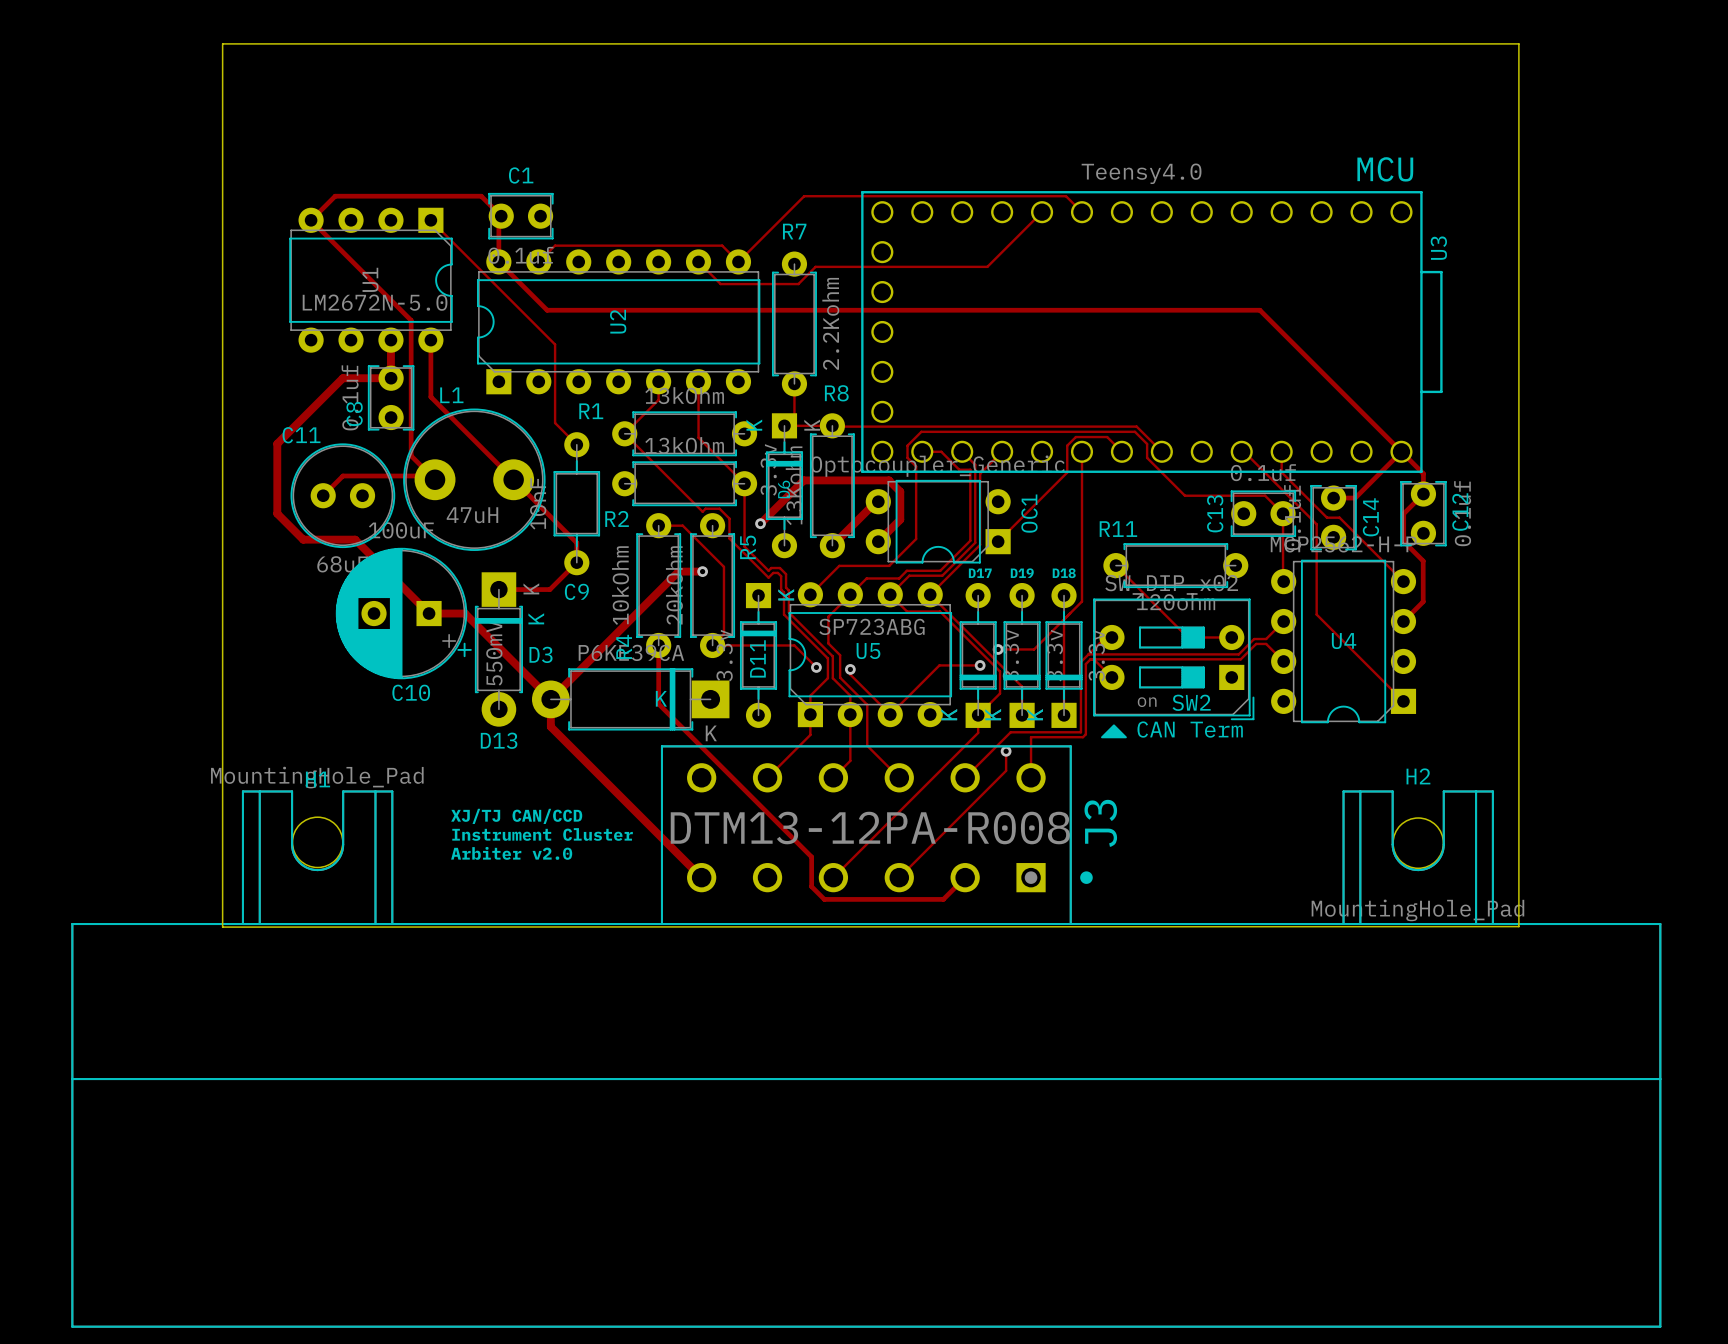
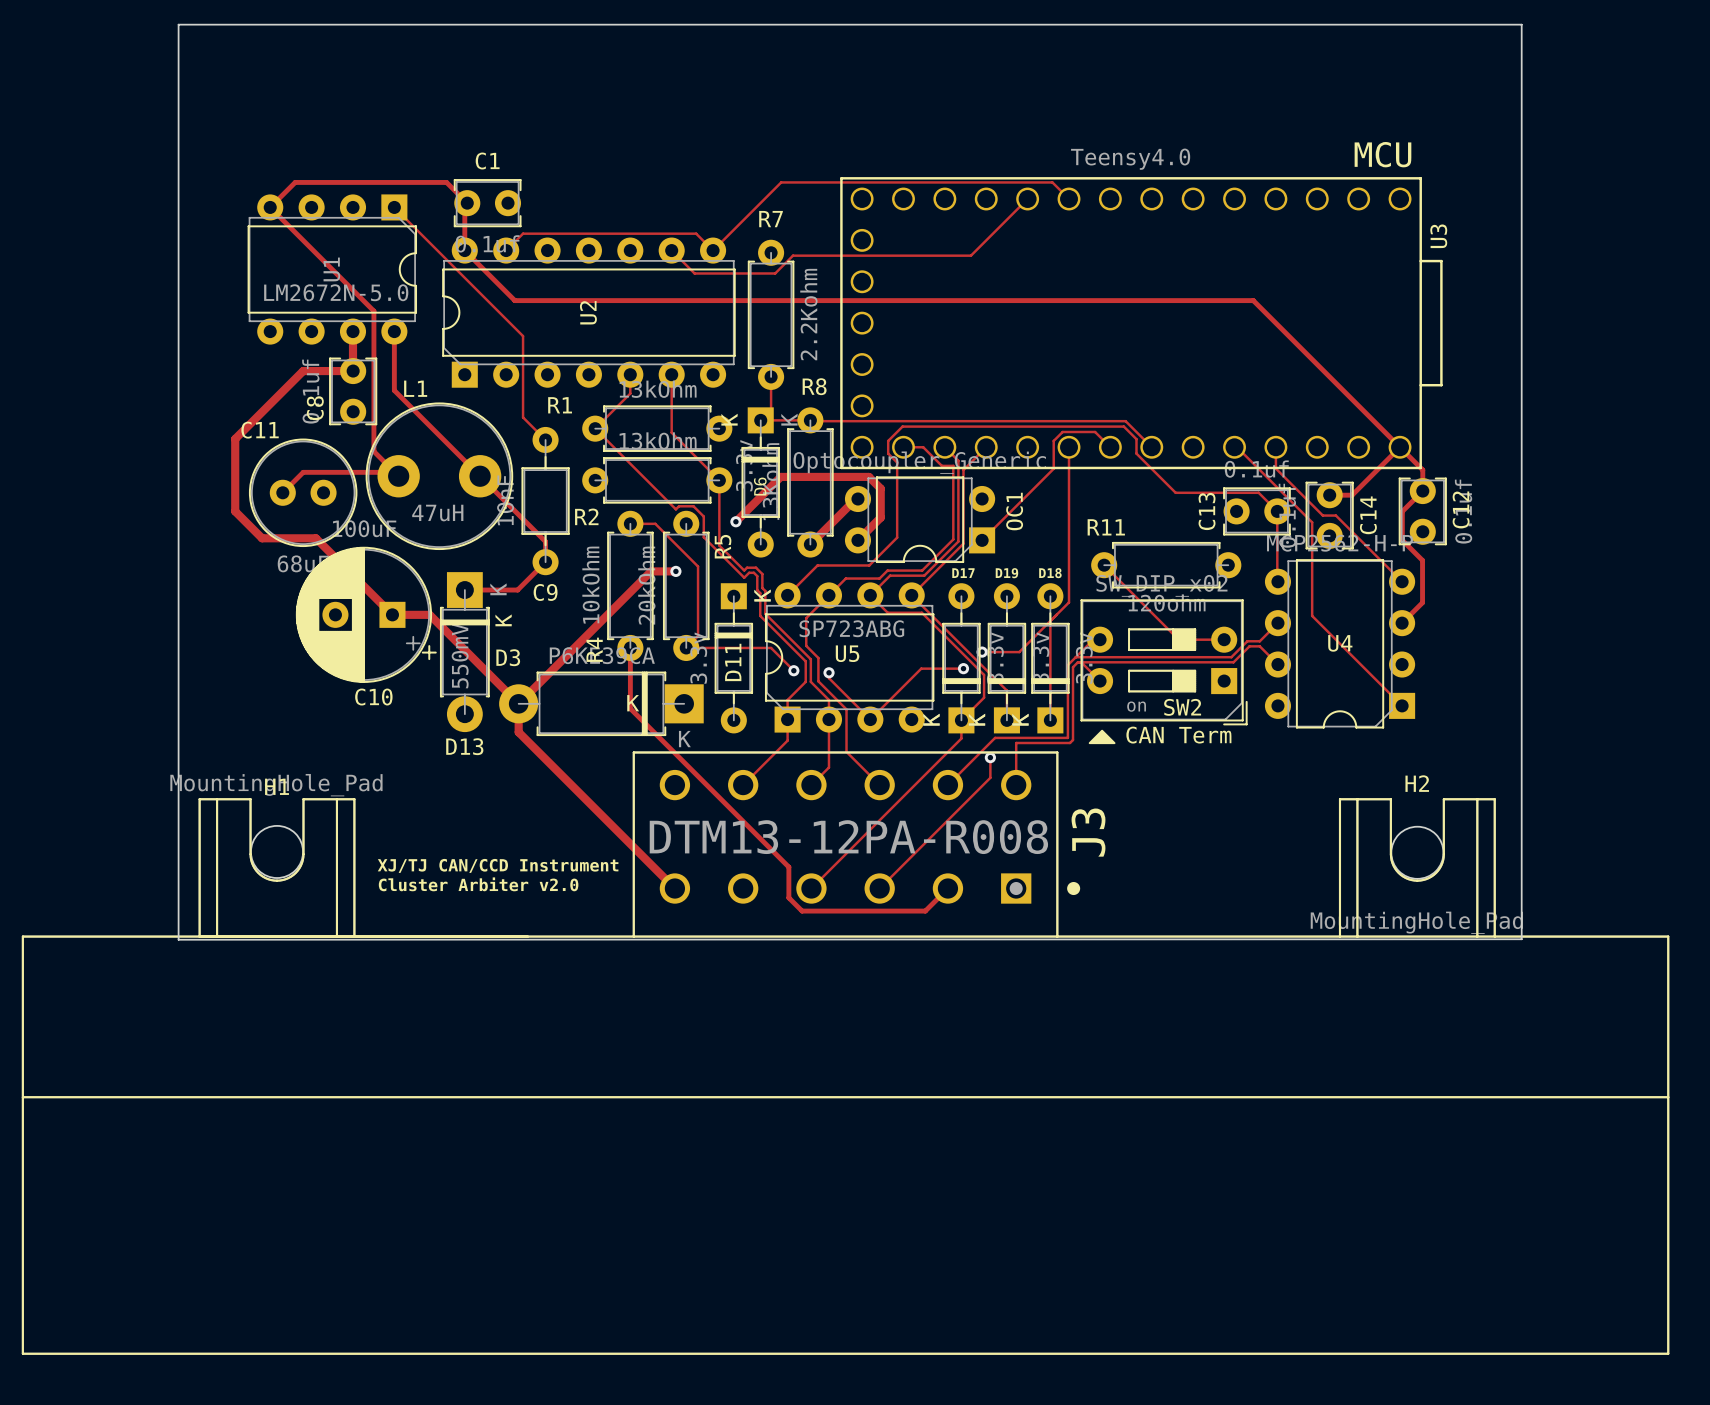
text: XJ/TJ CAN/CCD (516, 816) -> none
text: Instrument Cluster (542, 834) -> none
text: Arbiter v2.0 (511, 853) -> Cluster Arbiter v2.0 (478, 884)
text: none -> XJ/TJ CAN/CCD Instrument (498, 865)

